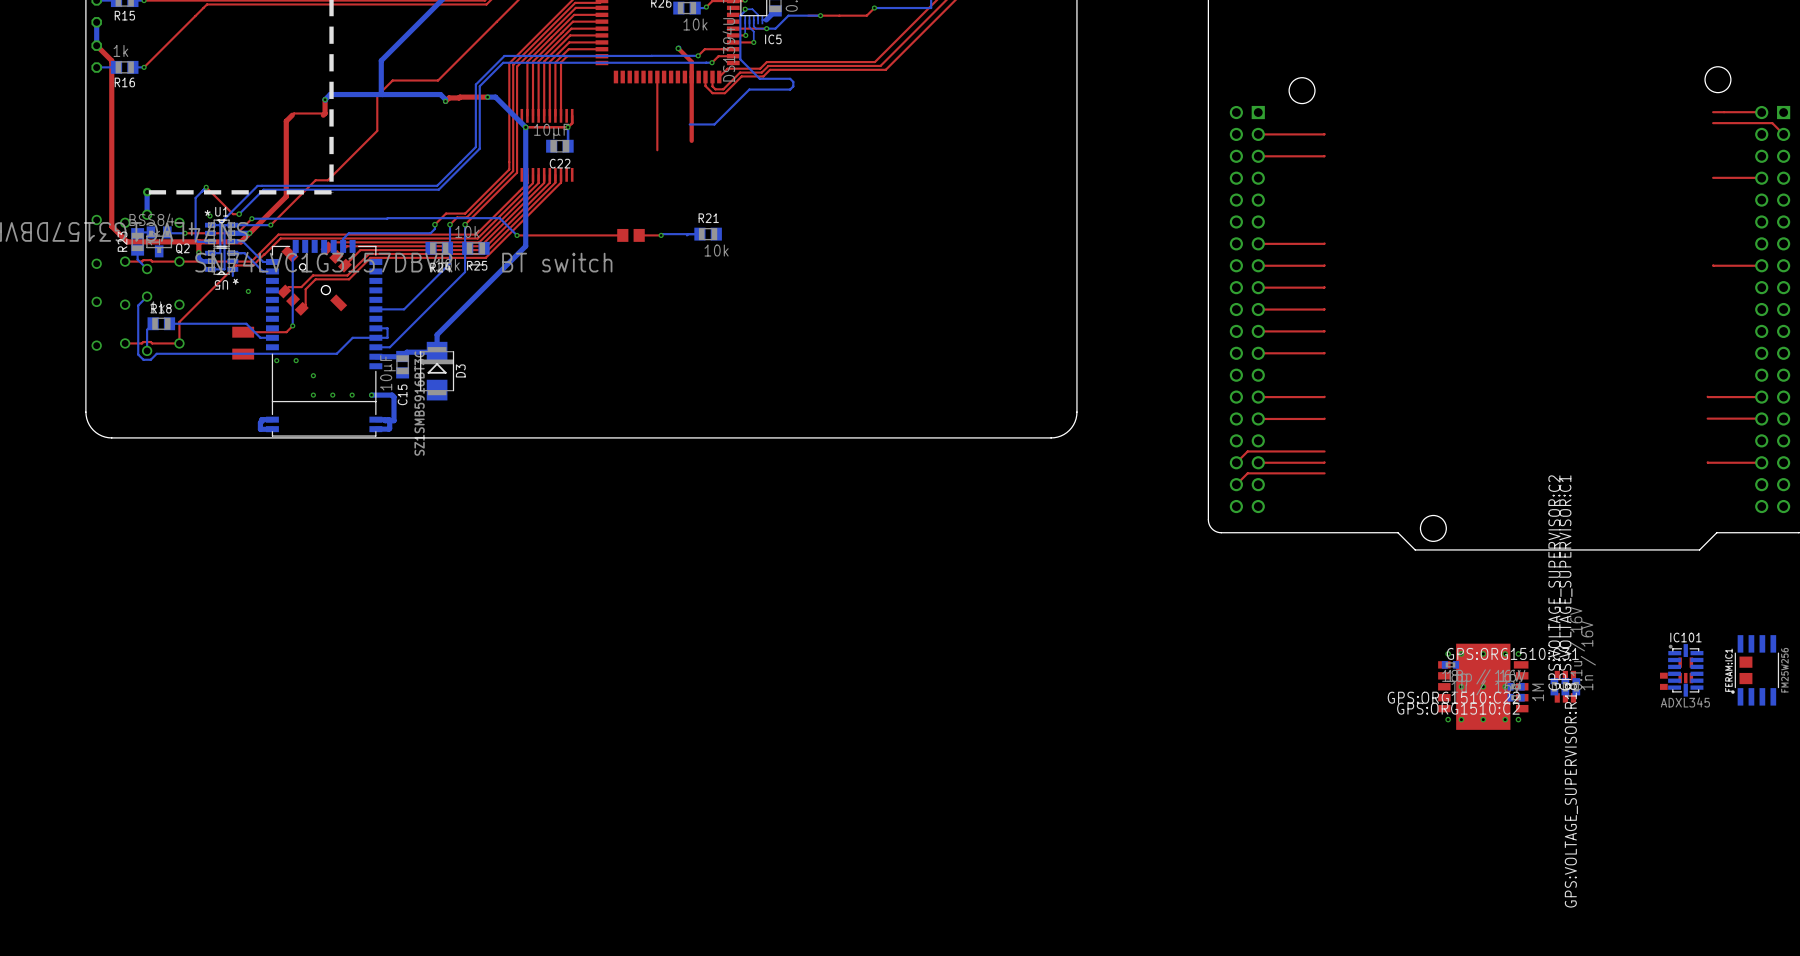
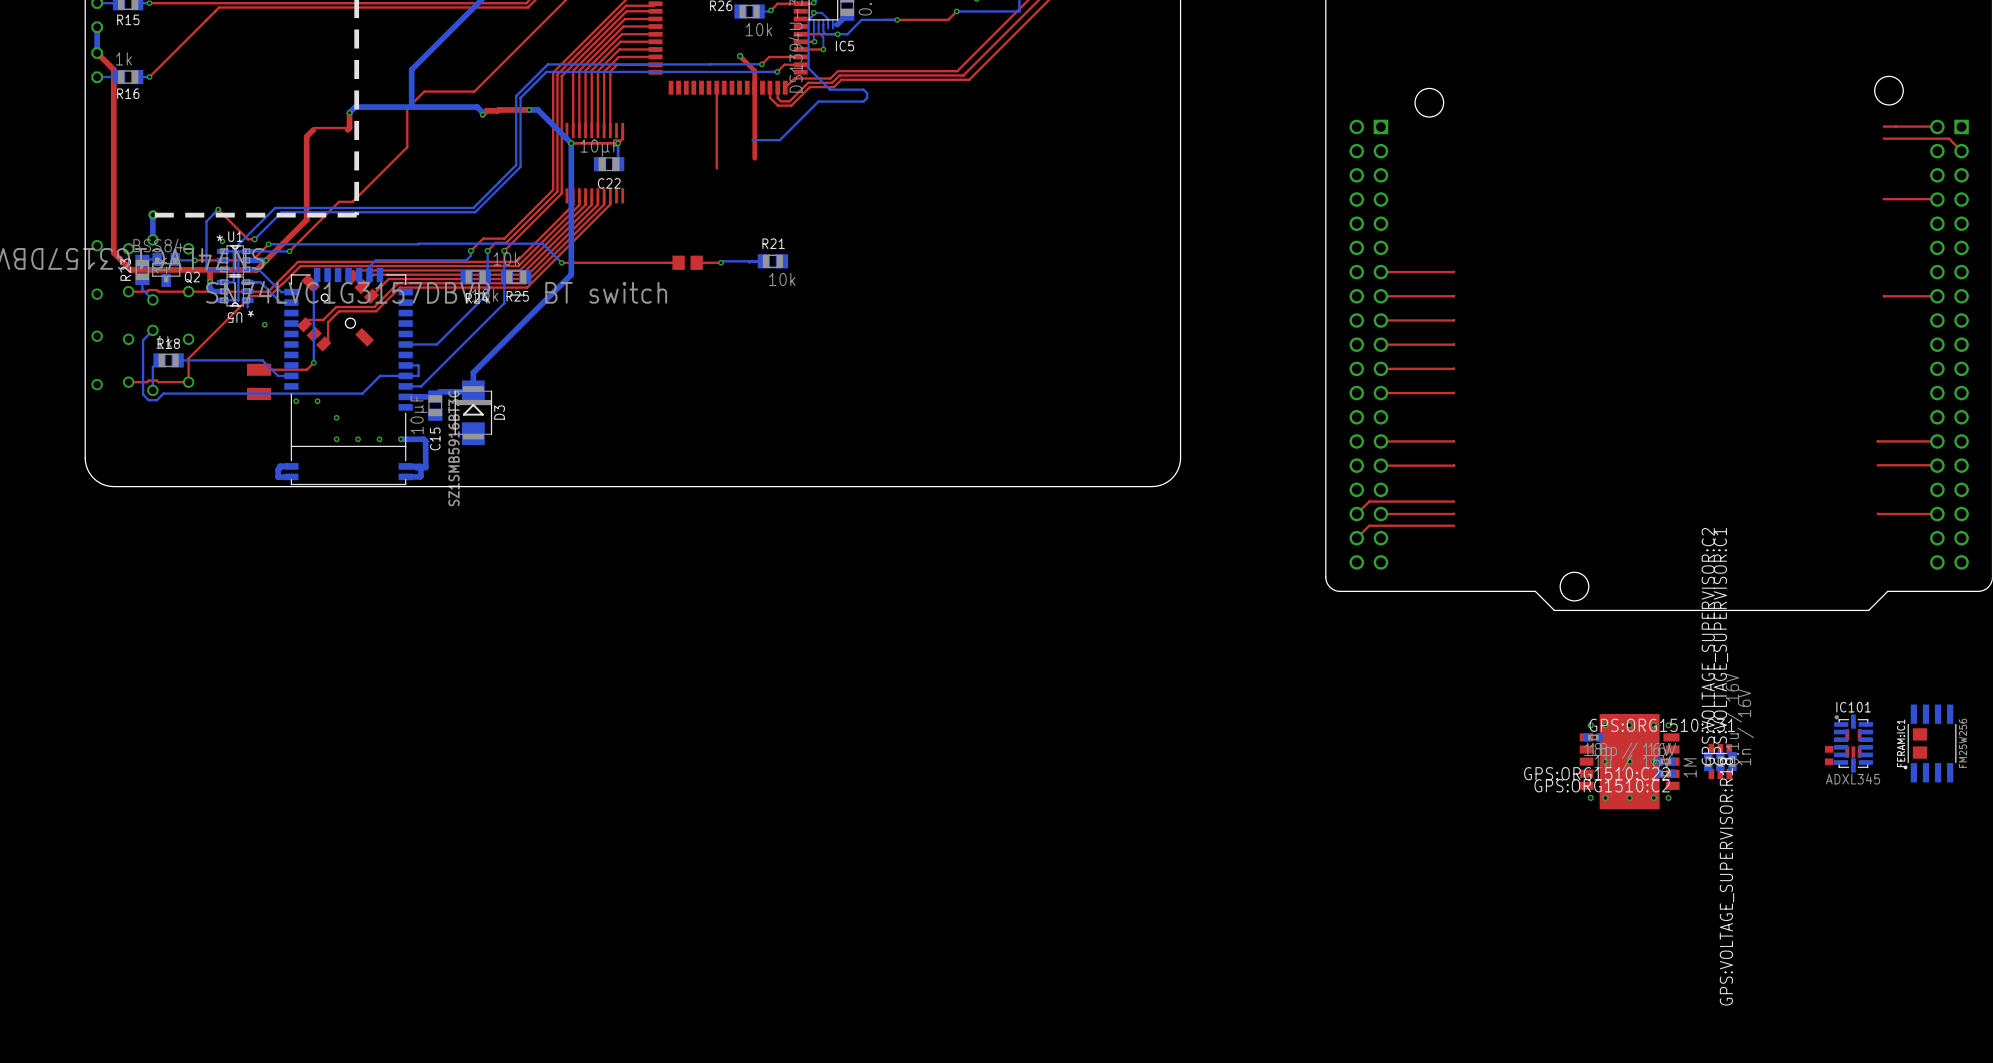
top track: (1324, 134) (1258, 134) -> none
top track: (1324, 155) (1258, 156) -> none

